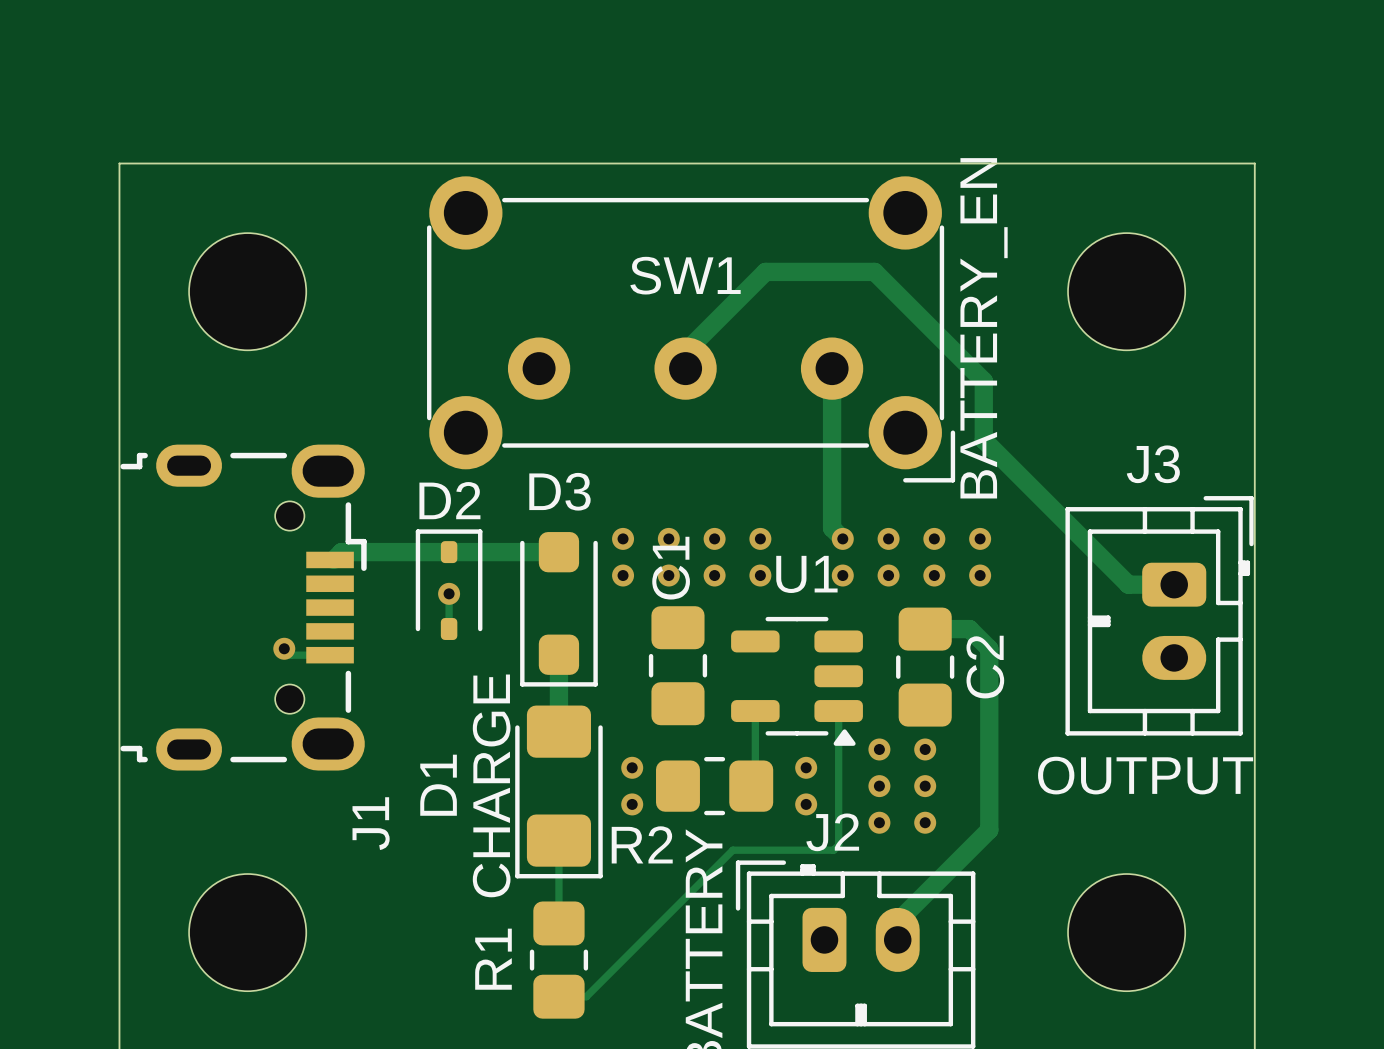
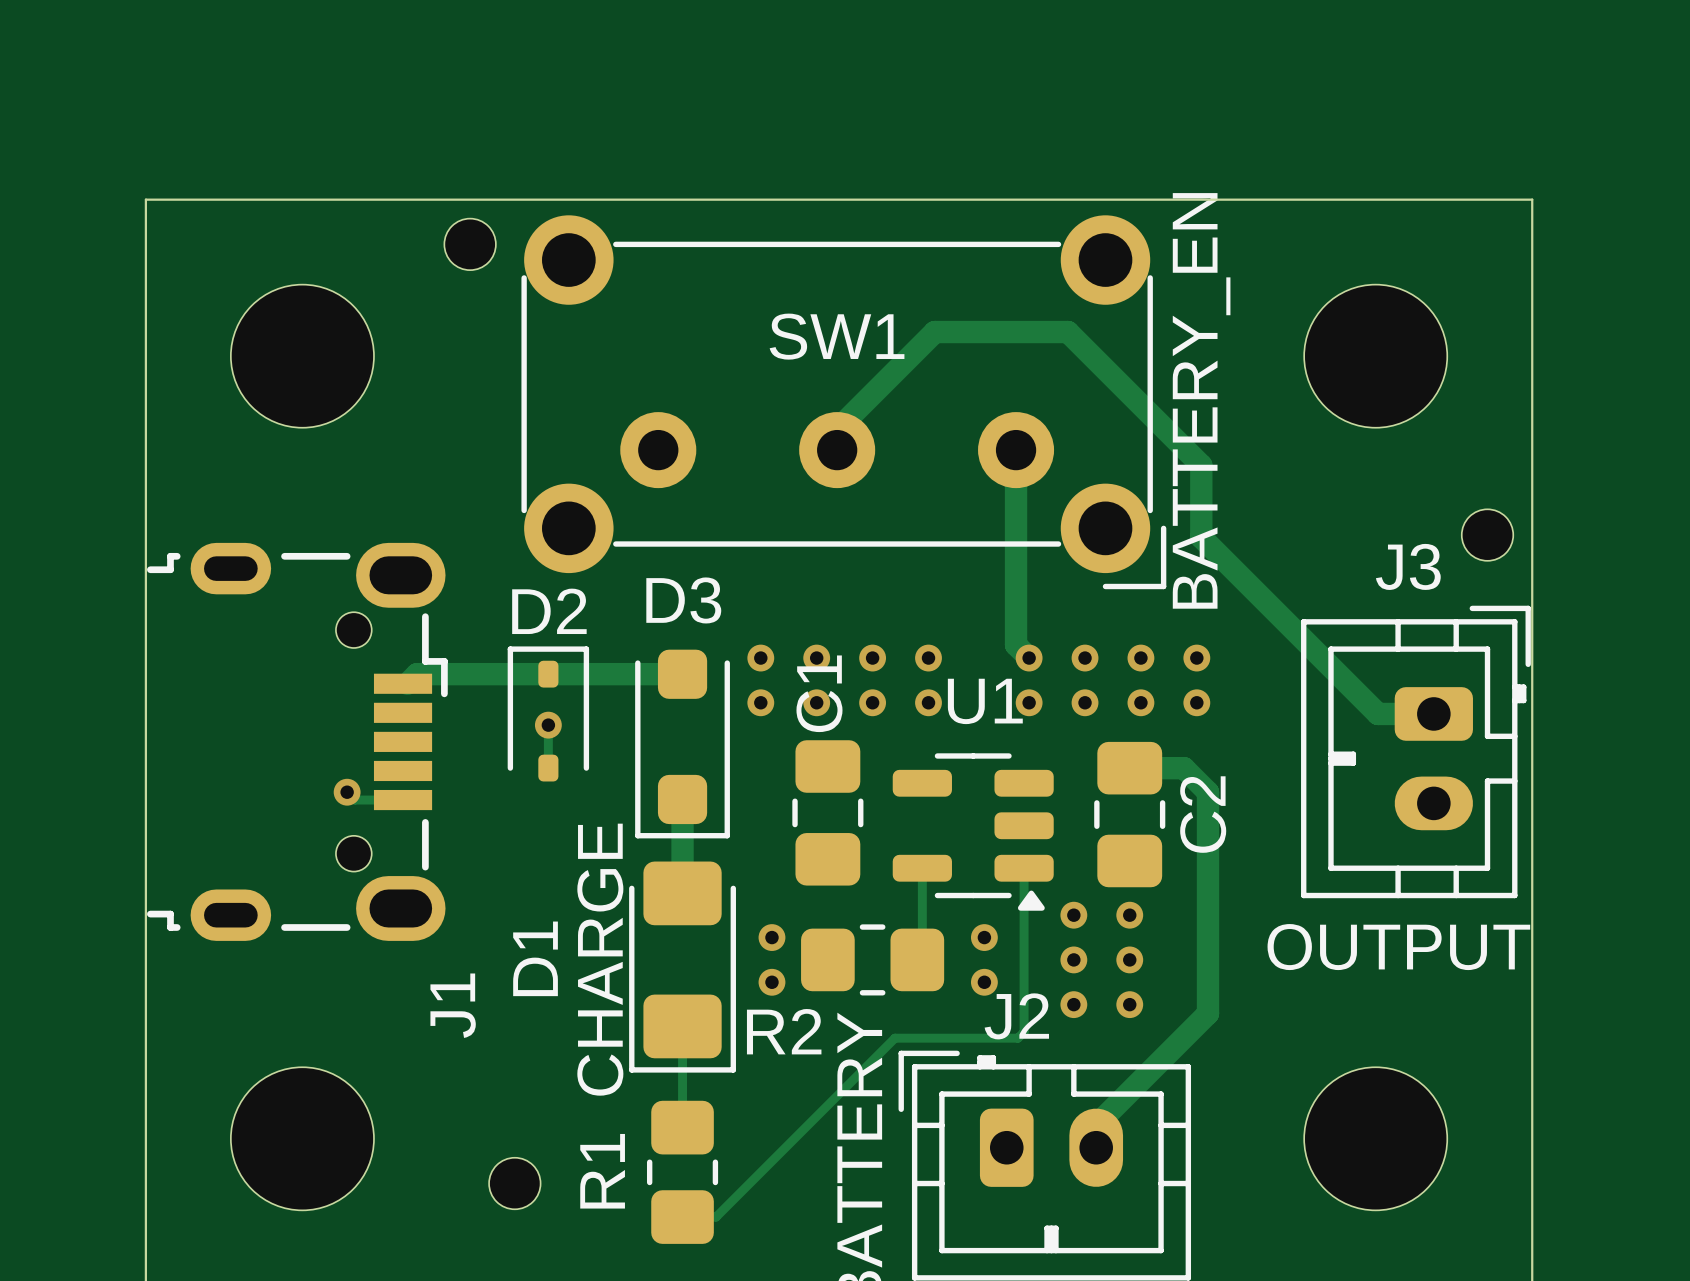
part: none -> (470, 244)
part: none -> (1487, 535)
part: none -> (514, 1183)

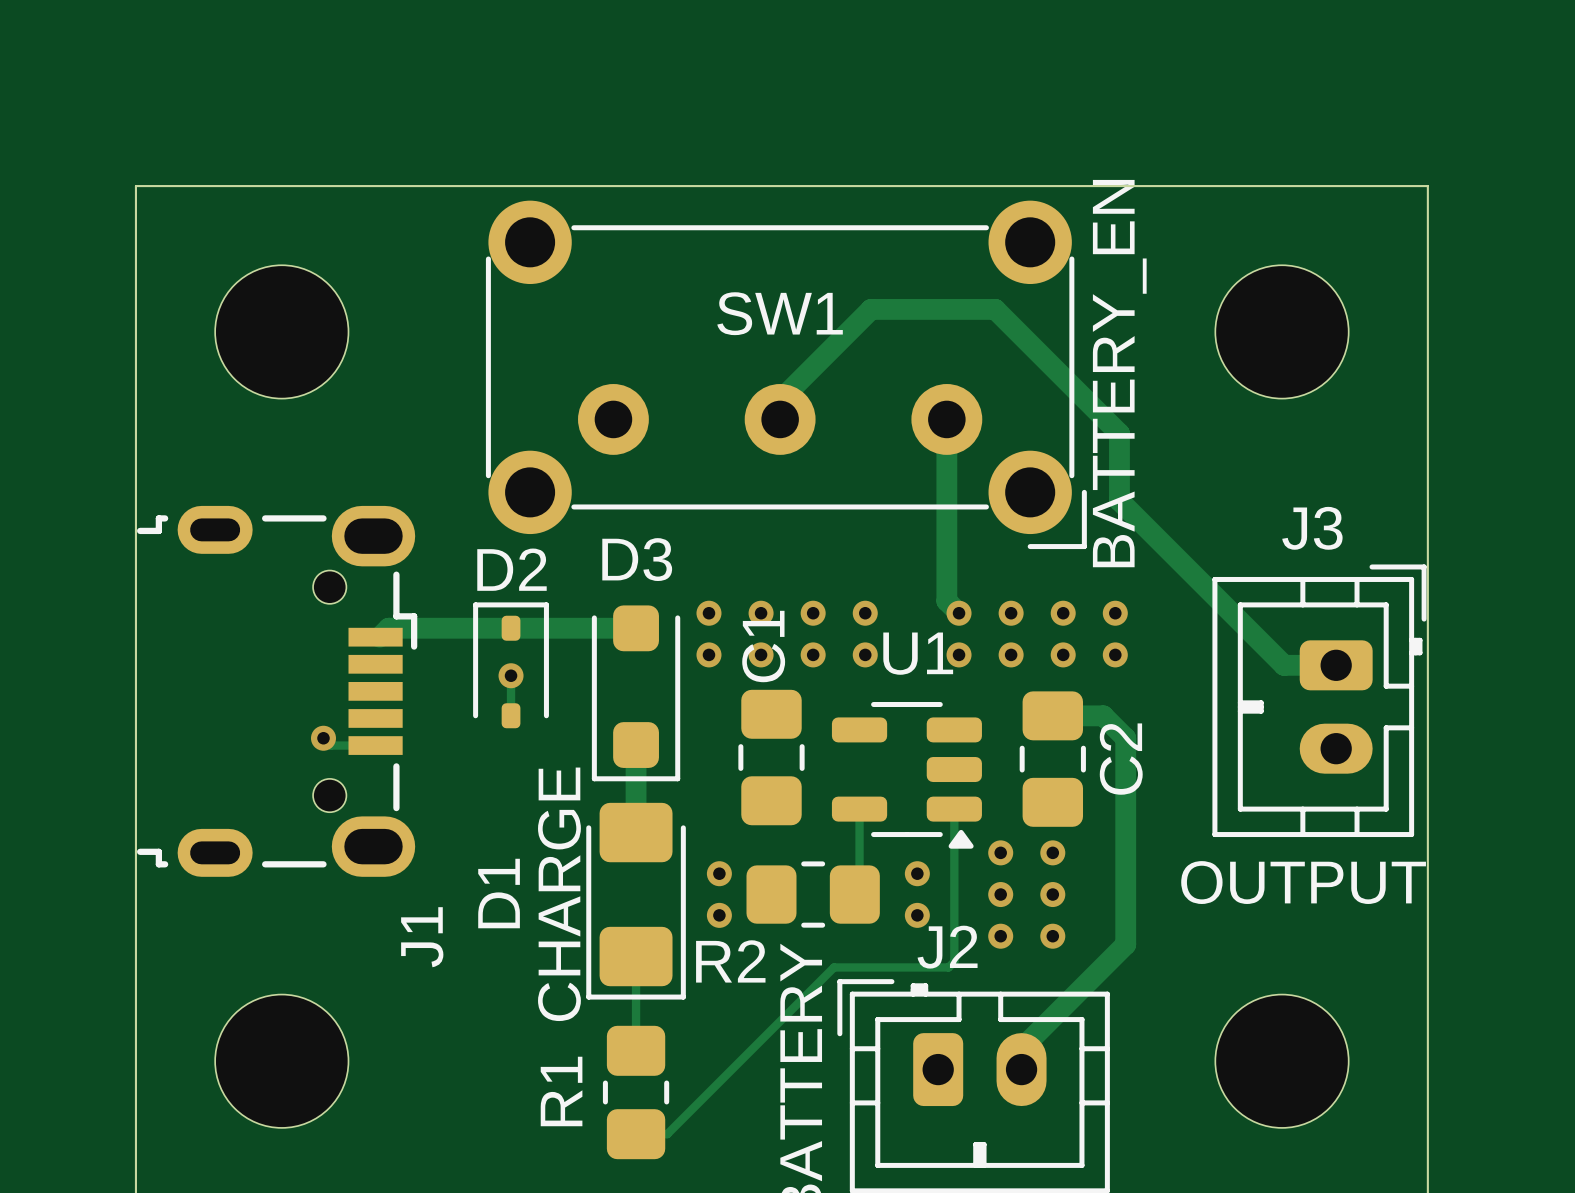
part: (470, 244) -> none
part: (1487, 535) -> none
part: (514, 1183) -> none

